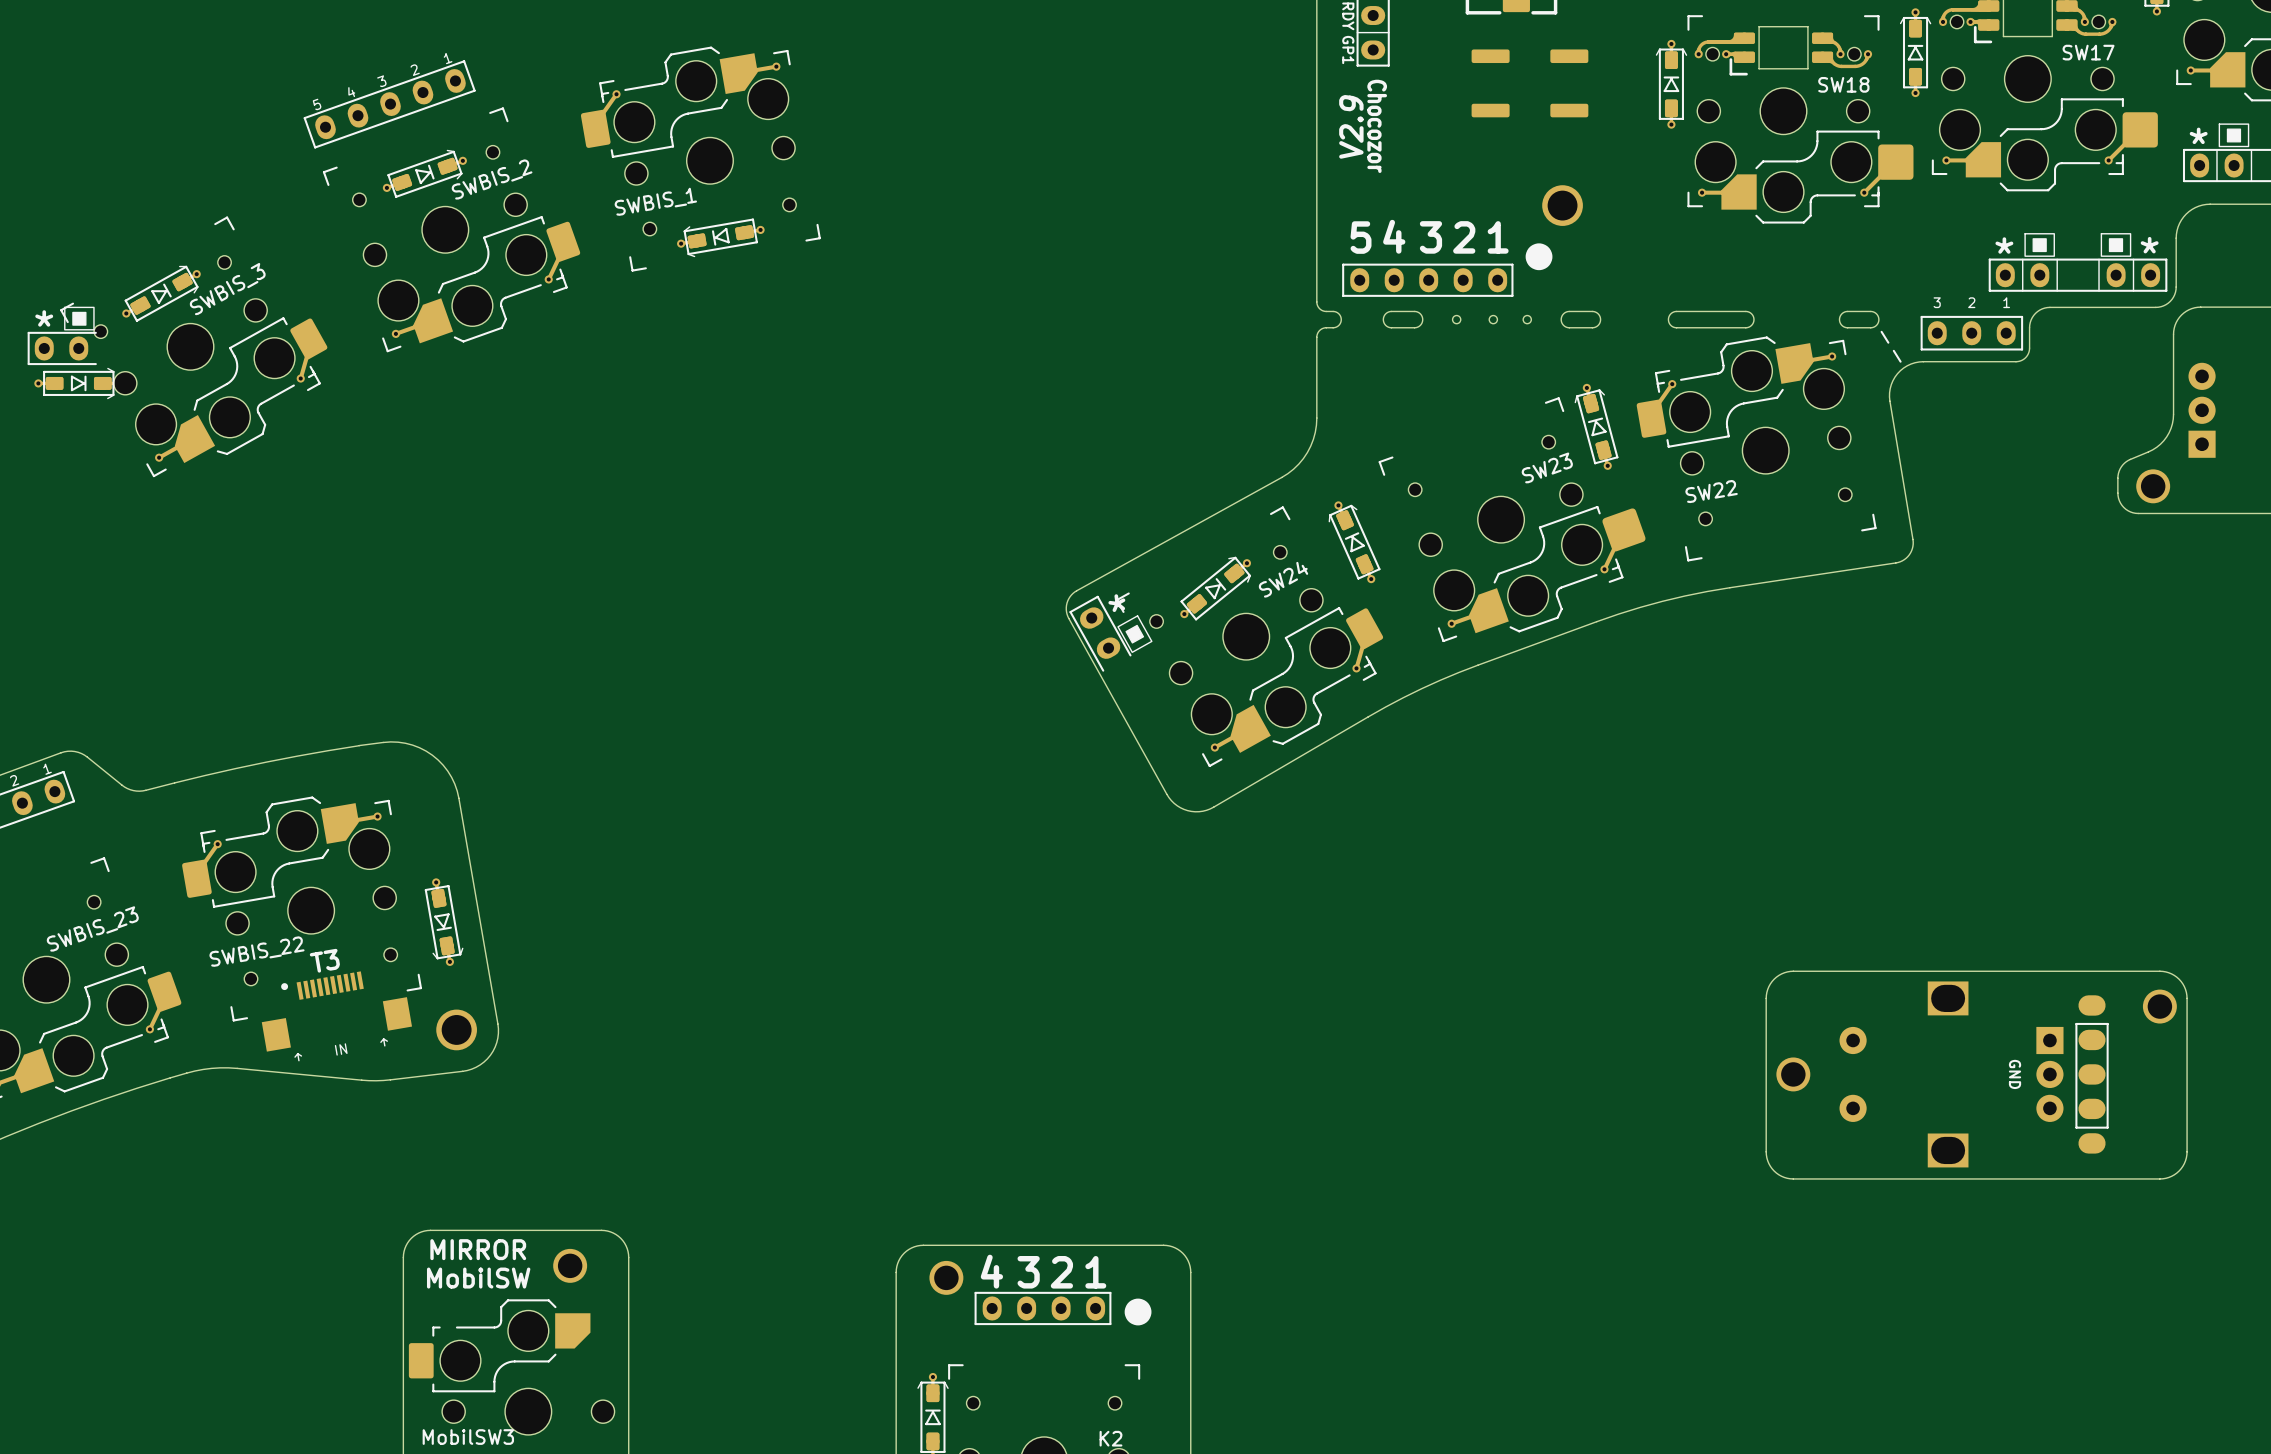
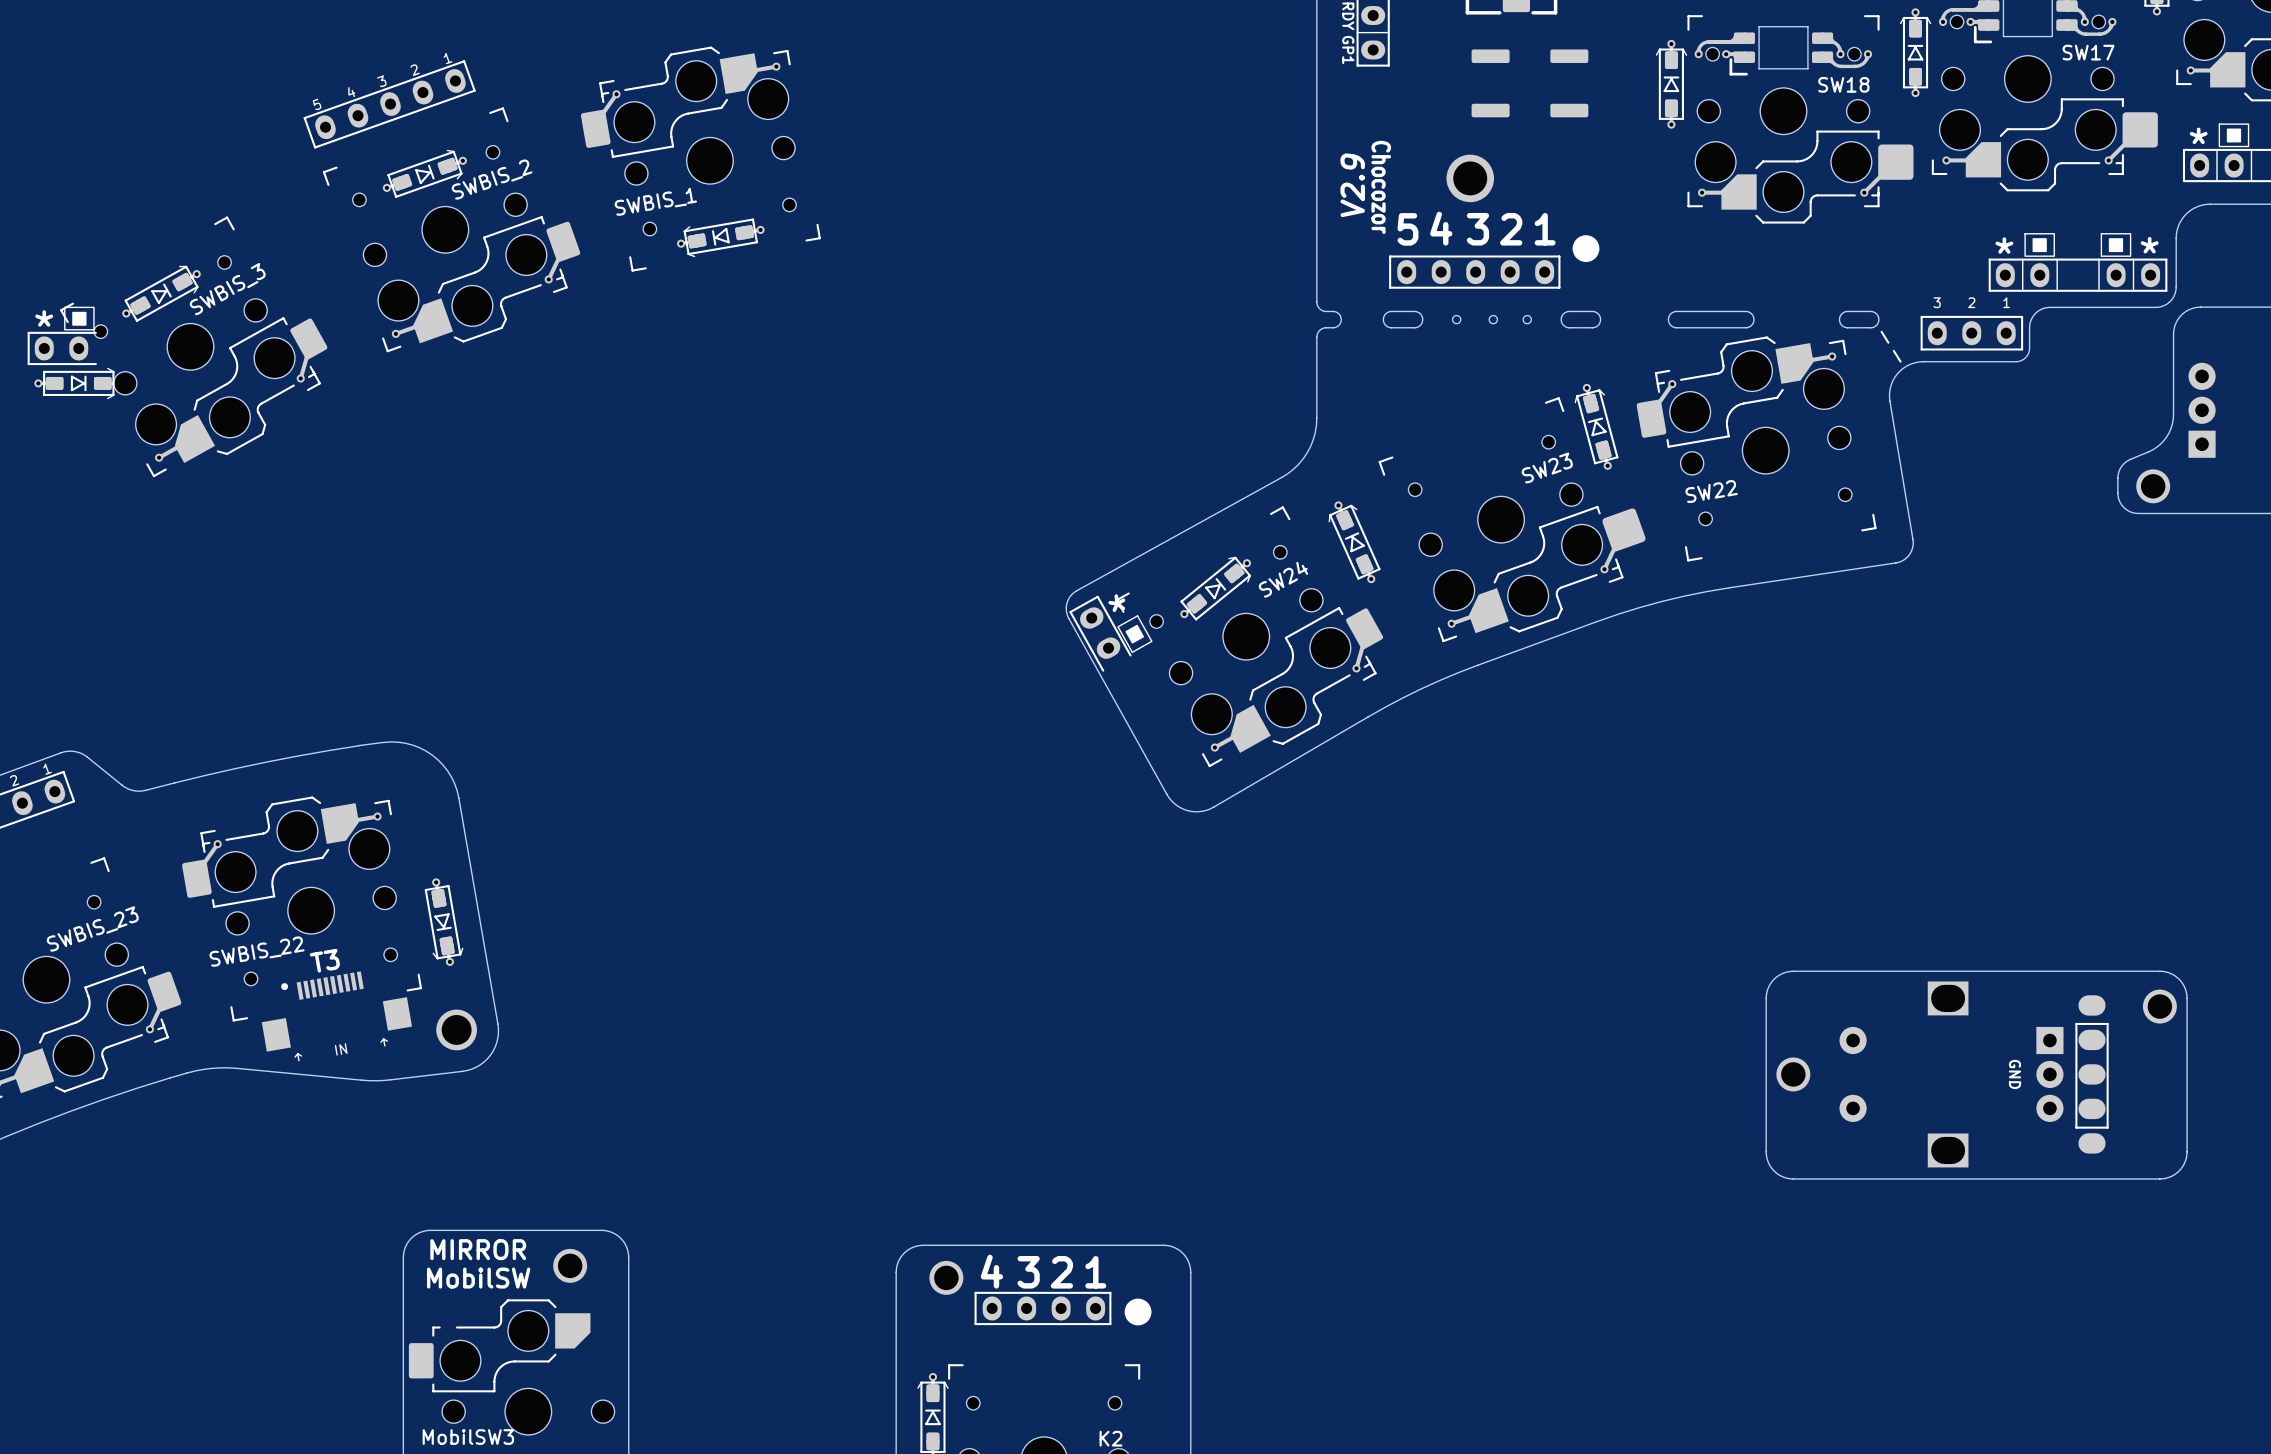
text position: V2.9 (1351, 126) -> V2.9 (1352, 185)
text position: Chocozor (1377, 126) -> Chocozor (1381, 187)
part: none -> (1470, 178)
part: (1562, 205) -> none
part position: (1447, 270) -> (1494, 261)

